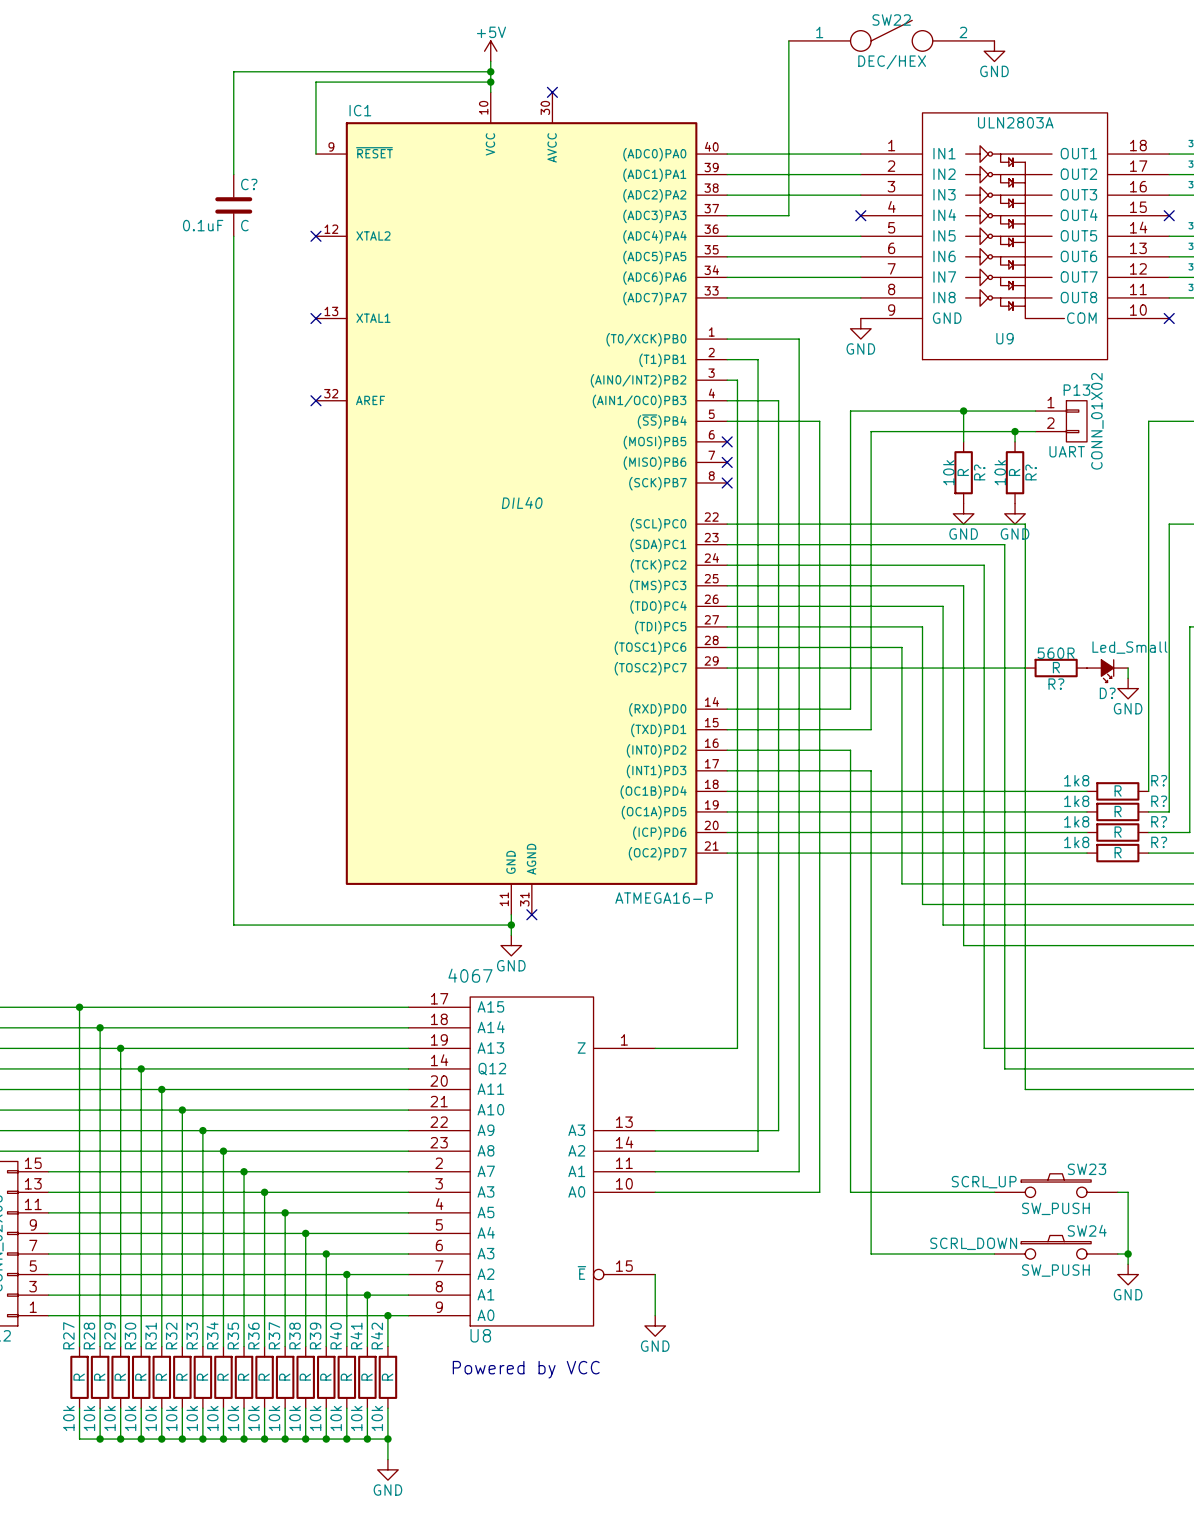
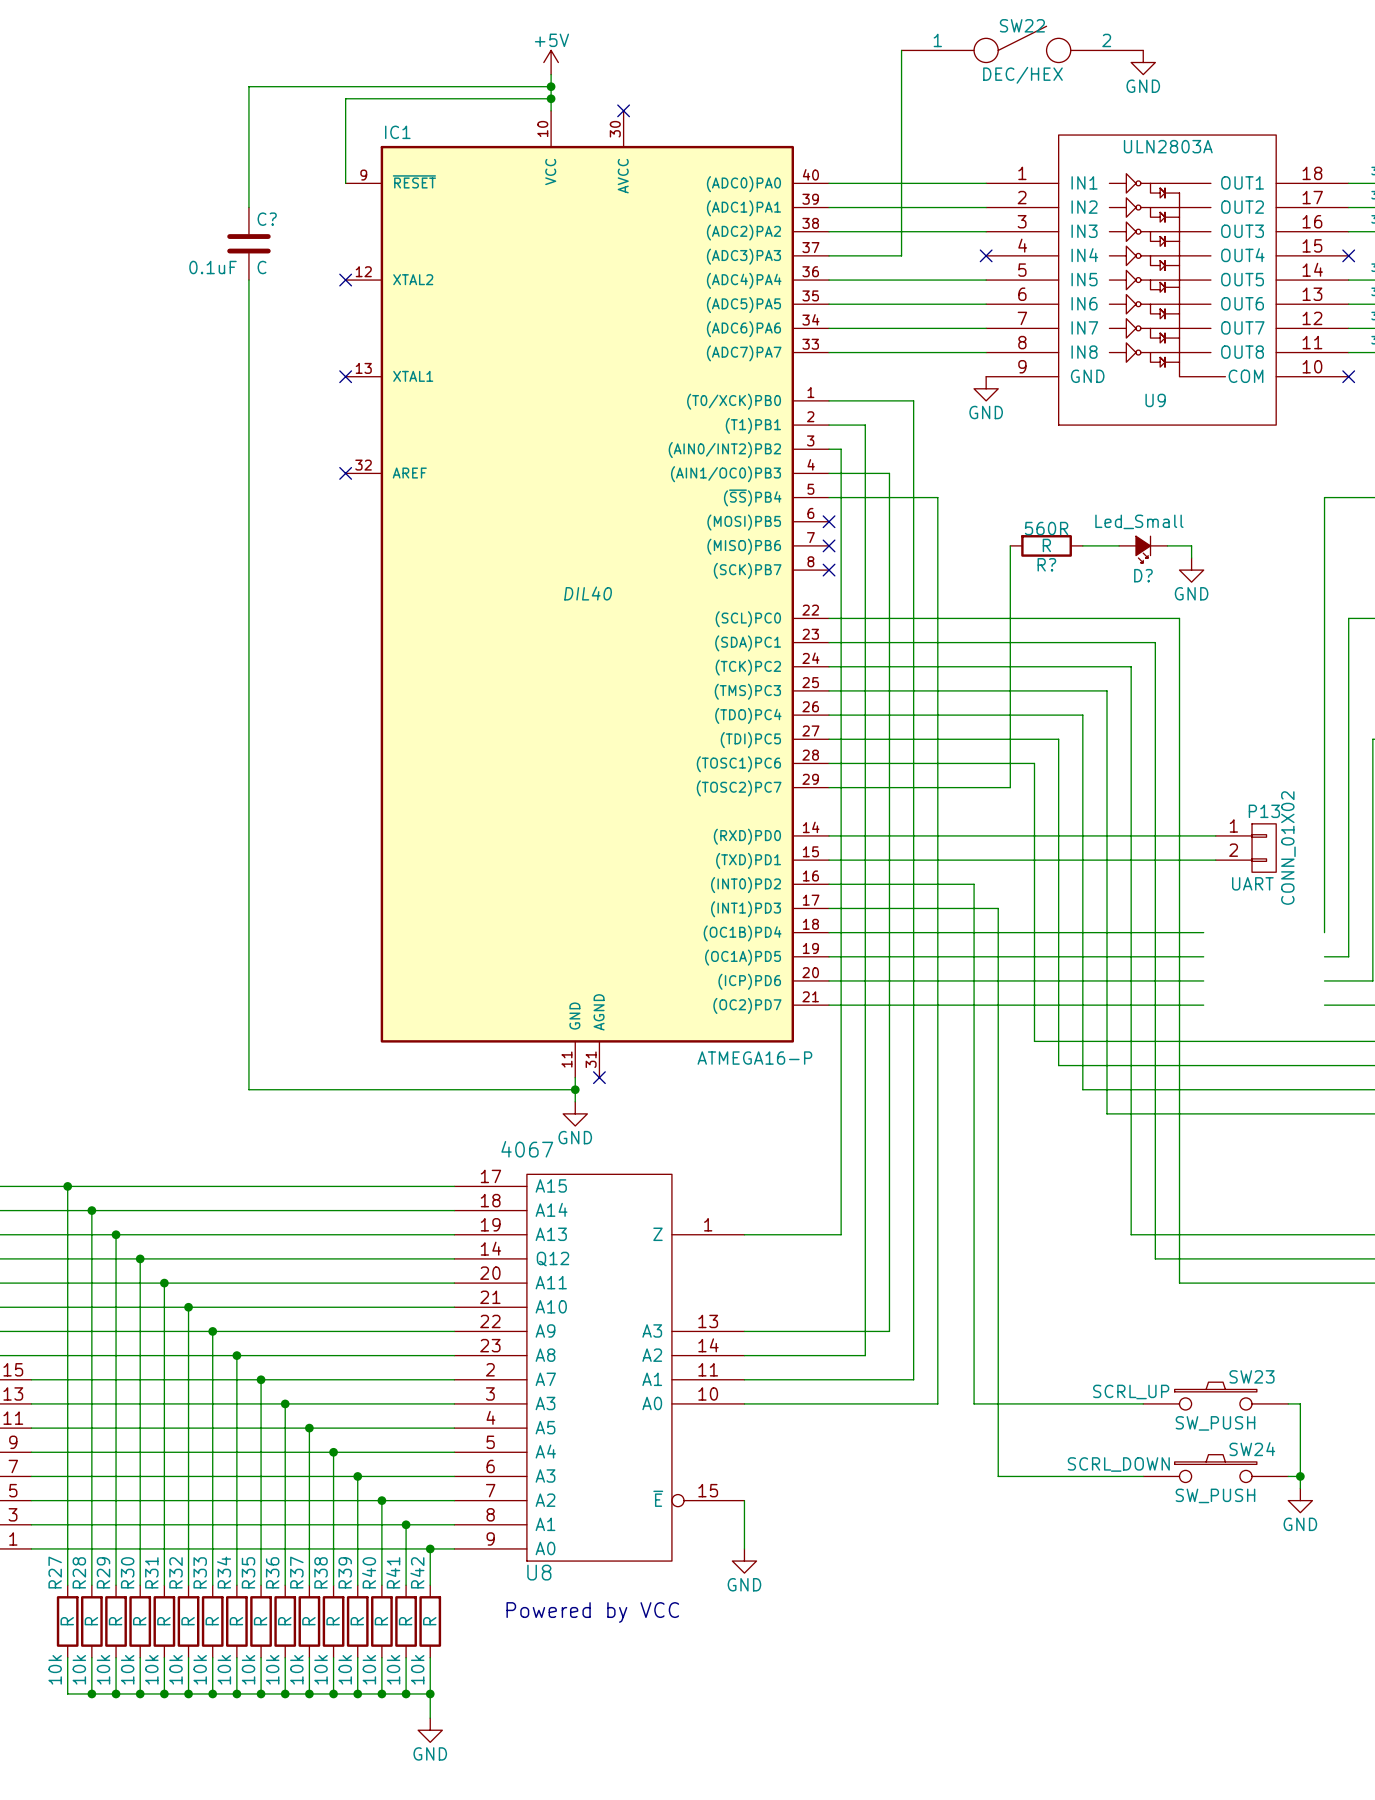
wire: (963, 411) (963, 441) -> none
junction: (963, 411) -> none
wire: (1035, 411) (850, 411) (850, 709) -> (1215, 835) (974, 835)
P13 position: (1061, 421) -> (1245, 848)
wire: (1015, 431) (1015, 441) -> none
junction: (1015, 431) -> none
wire: (1035, 431) (871, 431) (871, 729) -> (1215, 860) (998, 860)
R?: none -> R (1046, 545)
wire: none -> (1082, 545) (1119, 545)
wire: none -> (1167, 545) (1191, 545) (1191, 557)
D?: none -> Led_Small (1143, 549)
R?: R (963, 472) -> none
R?: R (1015, 472) -> none
power symbol: GND (963, 513) -> none
power symbol position: GND (1015, 513) -> GND (1191, 570)
wire: (881, 668) (1025, 668) -> (1010, 787) (1010, 545)
R?: R (1056, 668) -> none
wire: (1128, 668) (1128, 678) -> none
D?: Led_Small (1107, 671) -> none
power symbol: GND (1128, 688) -> none
wire: (1045, 791) (1086, 791) -> none
R?: R (1117, 791) -> none
wire: (1045, 811) (1086, 811) -> none
R?: R (1117, 811) -> none
wire: (1045, 832) (1086, 832) -> none
R?: R (1117, 832) -> none
wire: (1045, 853) (1086, 853) -> none
R?: R (1117, 853) -> none

